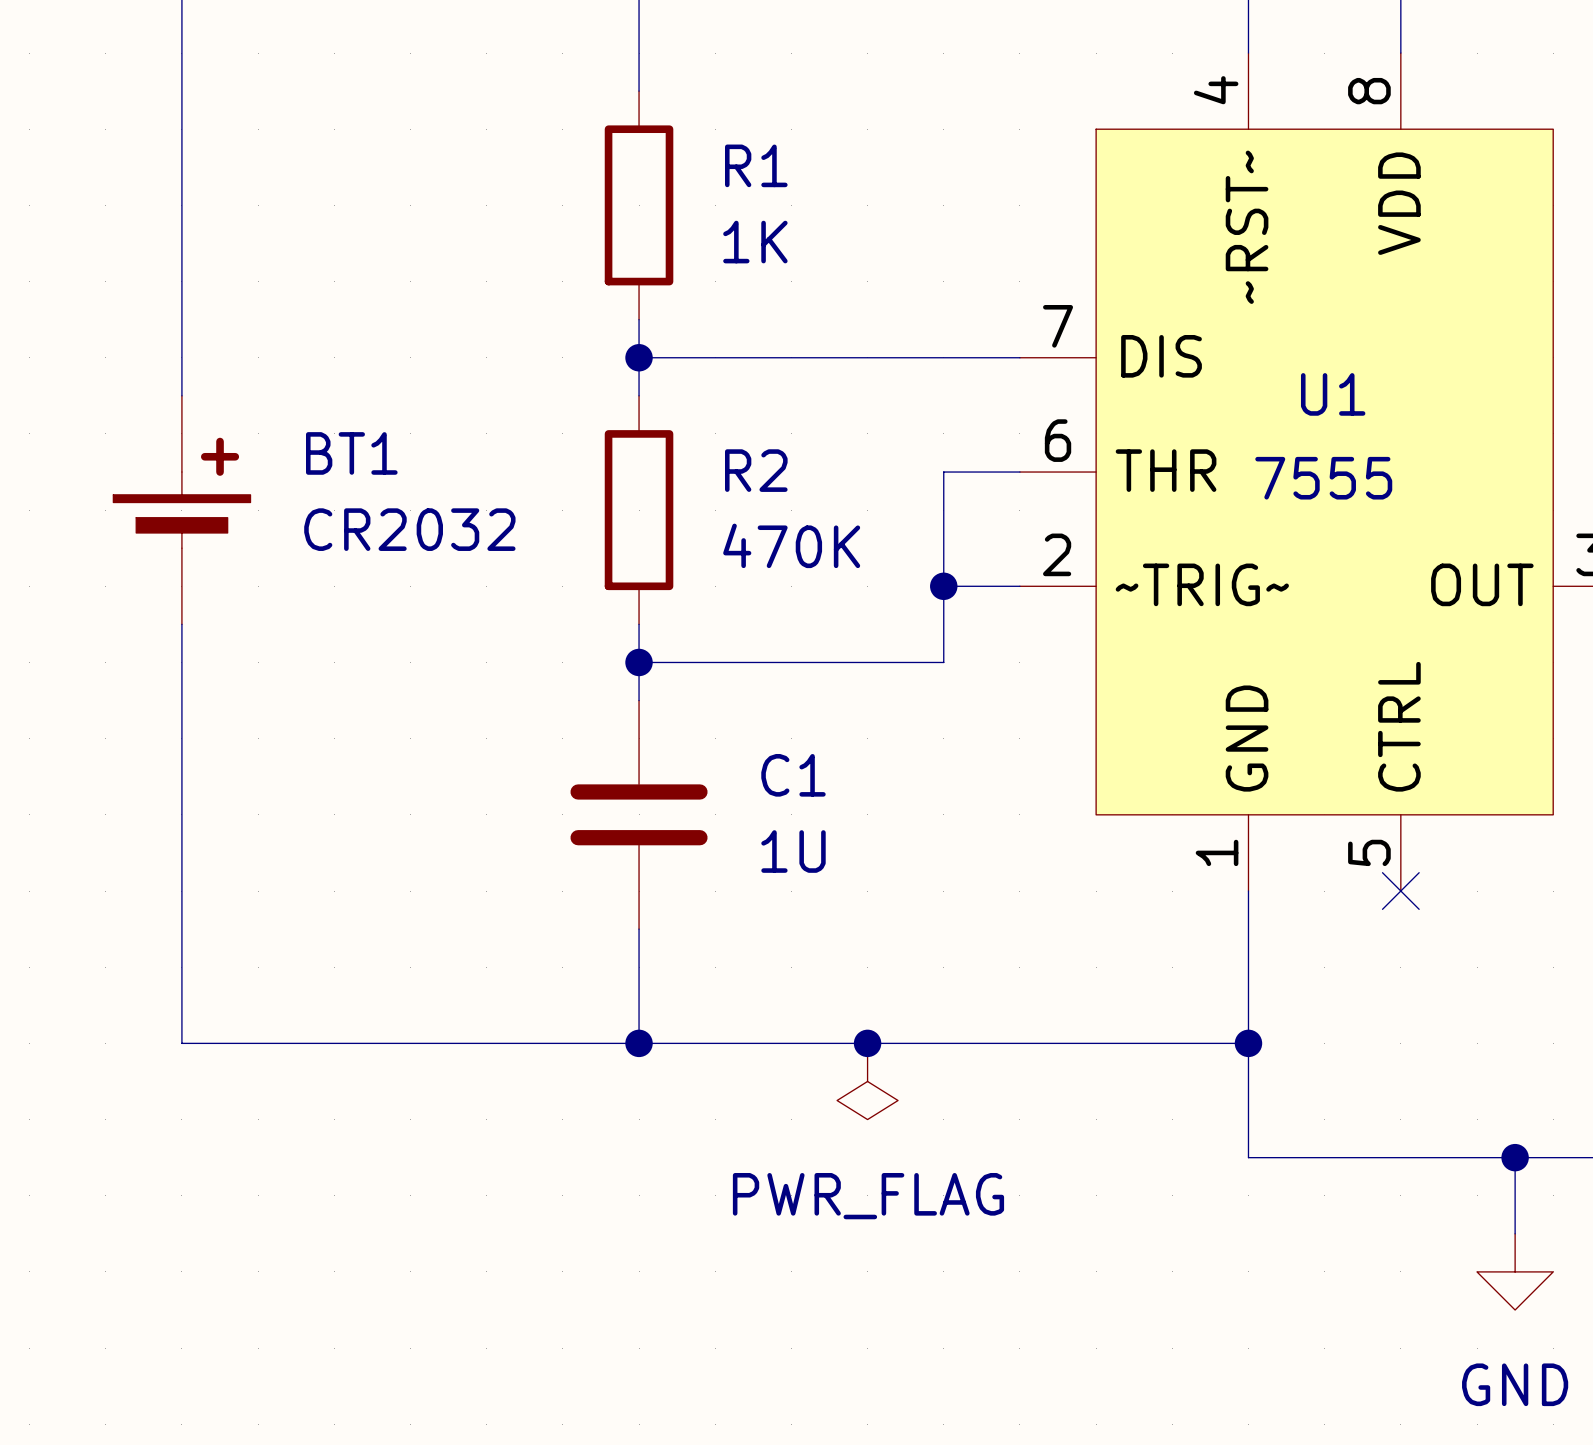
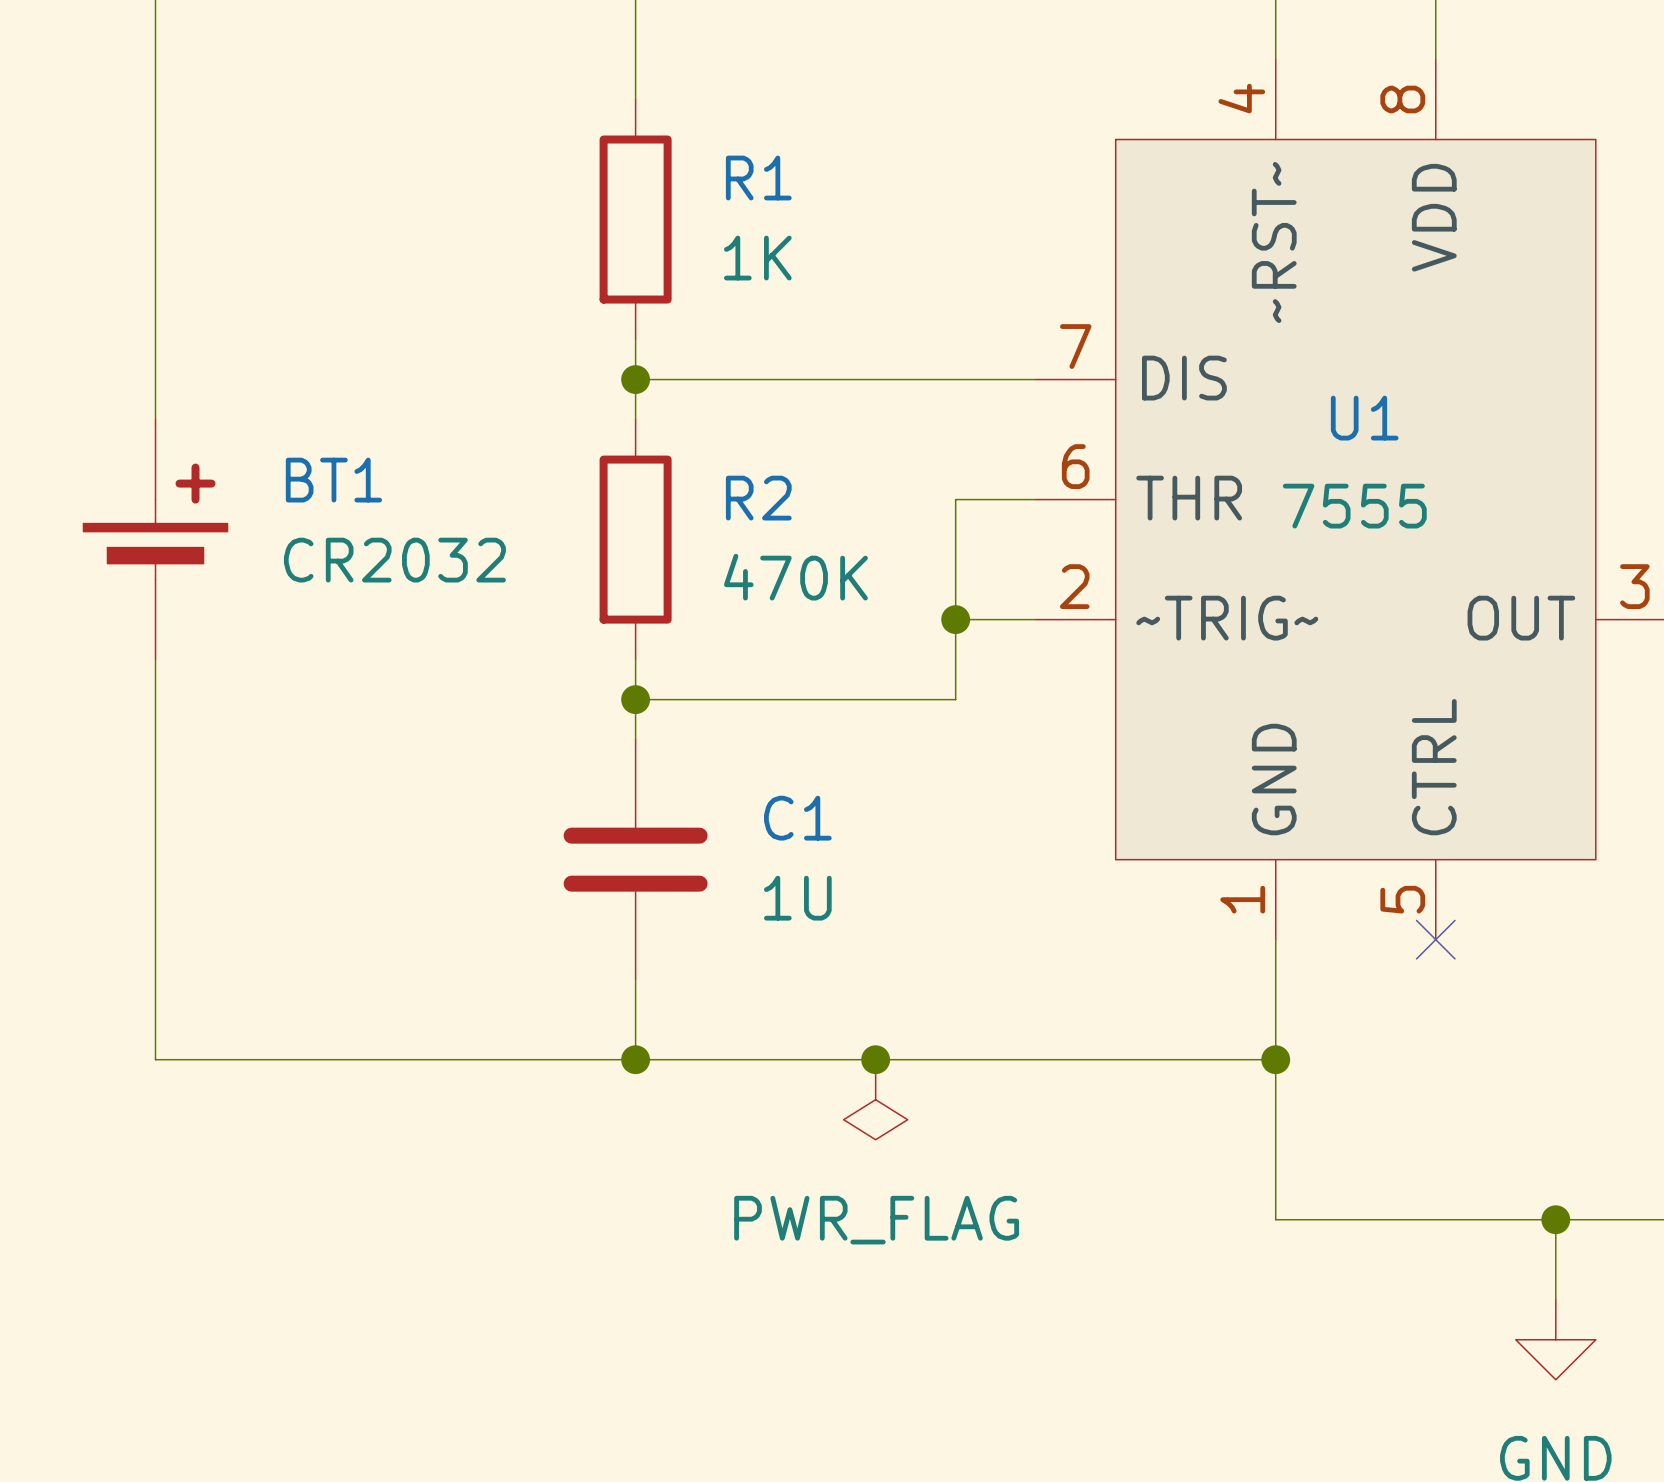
wire: (181, 1005) (181, 1043) (1248, 1043) -> (155, 1059) (1275, 1059)
wire: (639, 1005) (639, 1043) -> none
junction position: (639, 1043) -> (635, 1059)
junction position: (867, 1043) -> (875, 1059)
junction position: (1248, 1043) -> (1275, 1059)
power symbol position: PWR_FLAG (867, 1081) -> PWR_FLAG (875, 1099)

